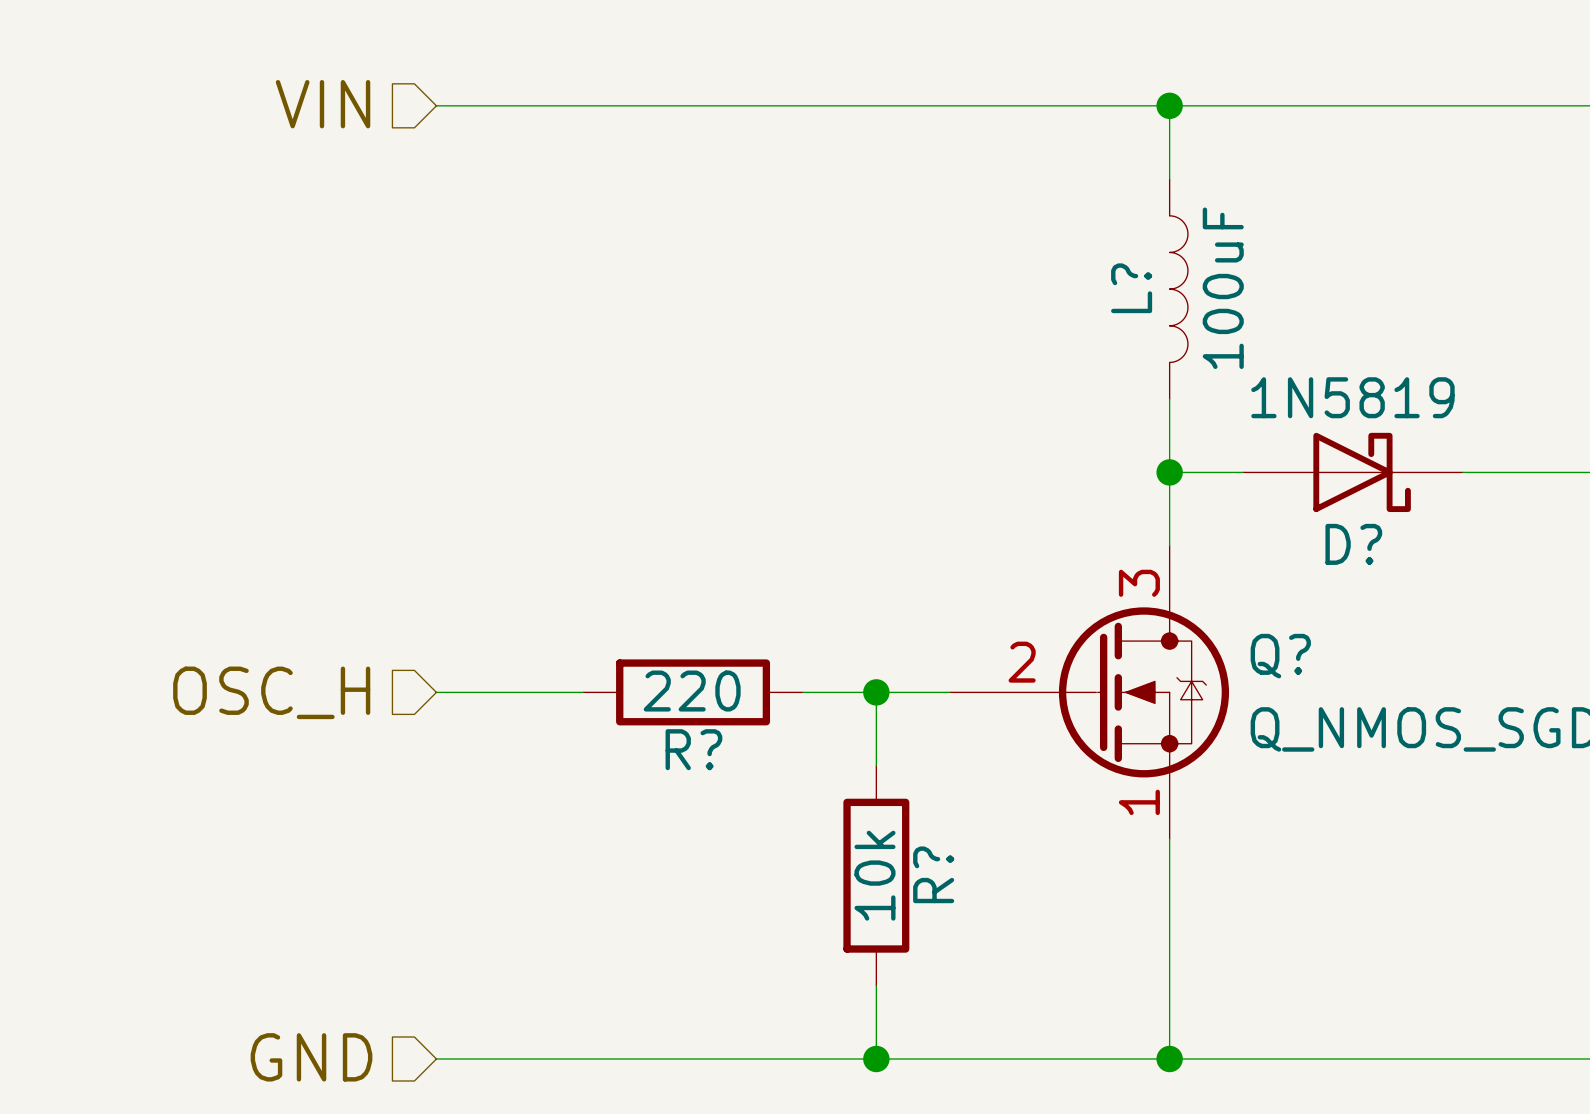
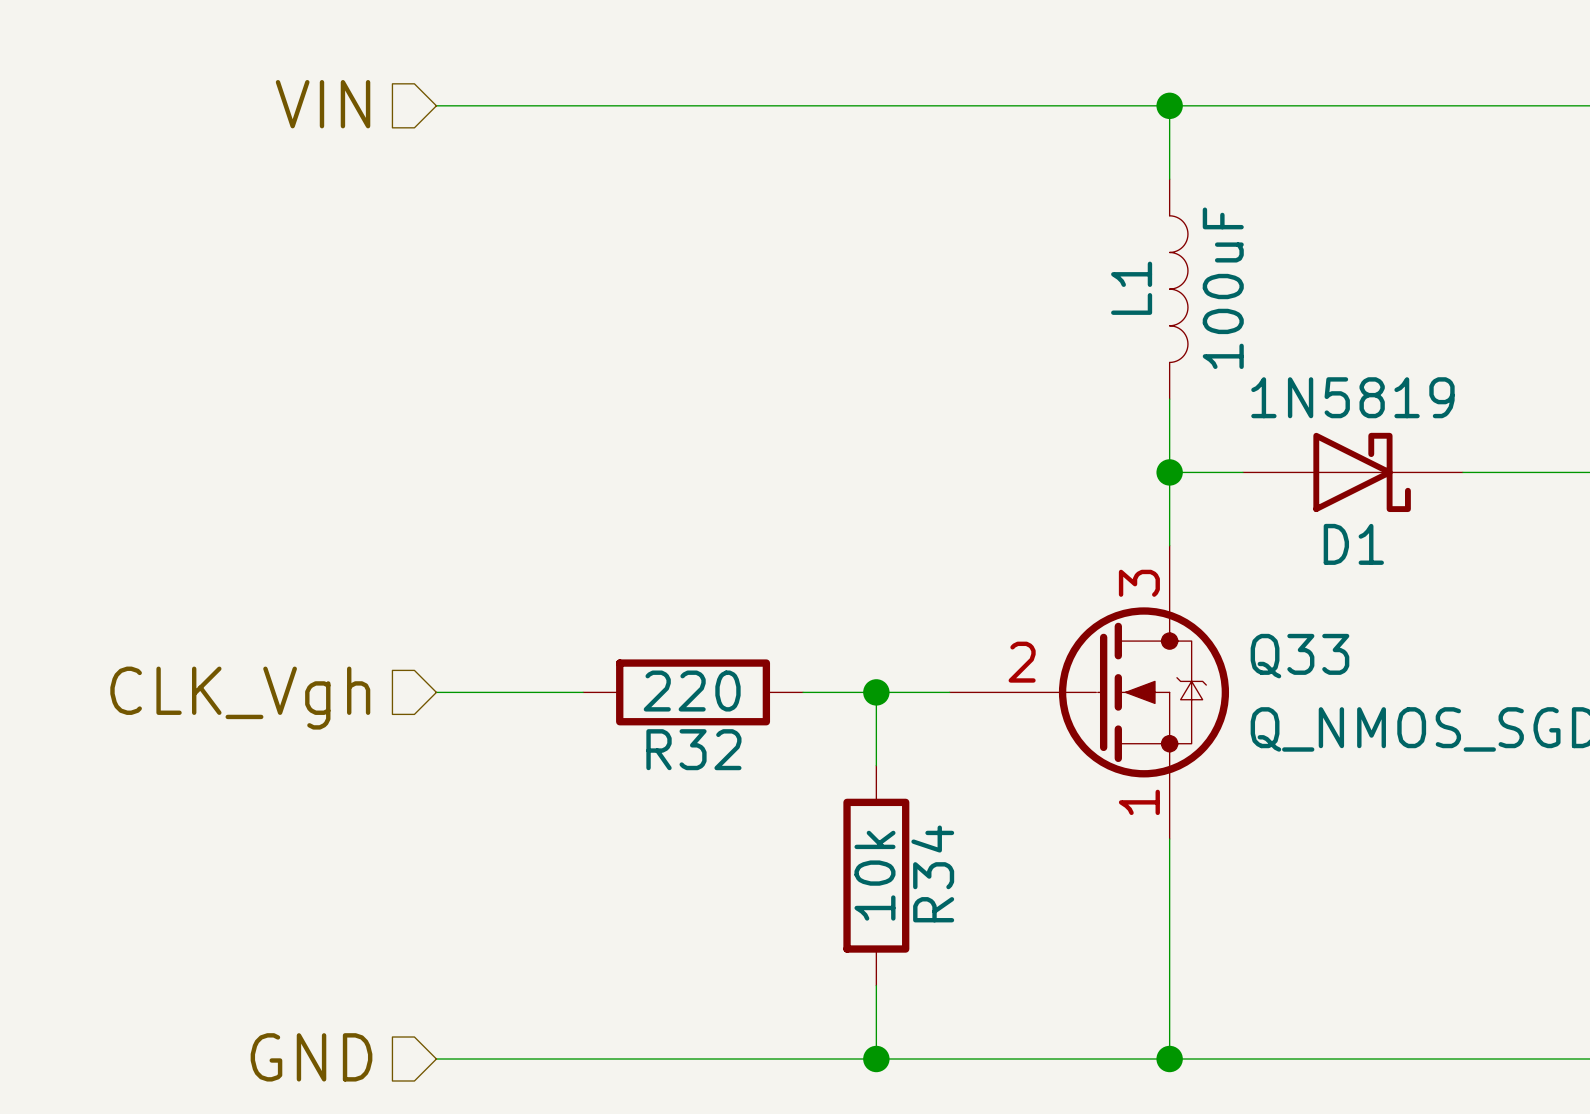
L? name: L? (1131, 288) -> L1 (1131, 288)
D? name: D? (1353, 544) -> D1 (1353, 544)
Q? name: Q? (1280, 656) -> Q33 (1299, 656)
hierarchical label: OSC_H (271, 692) -> CLK_Vgh (240, 698)
R? name: R? (693, 749) -> R32 (693, 749)
R? name: R? (933, 874) -> R34 (932, 873)

